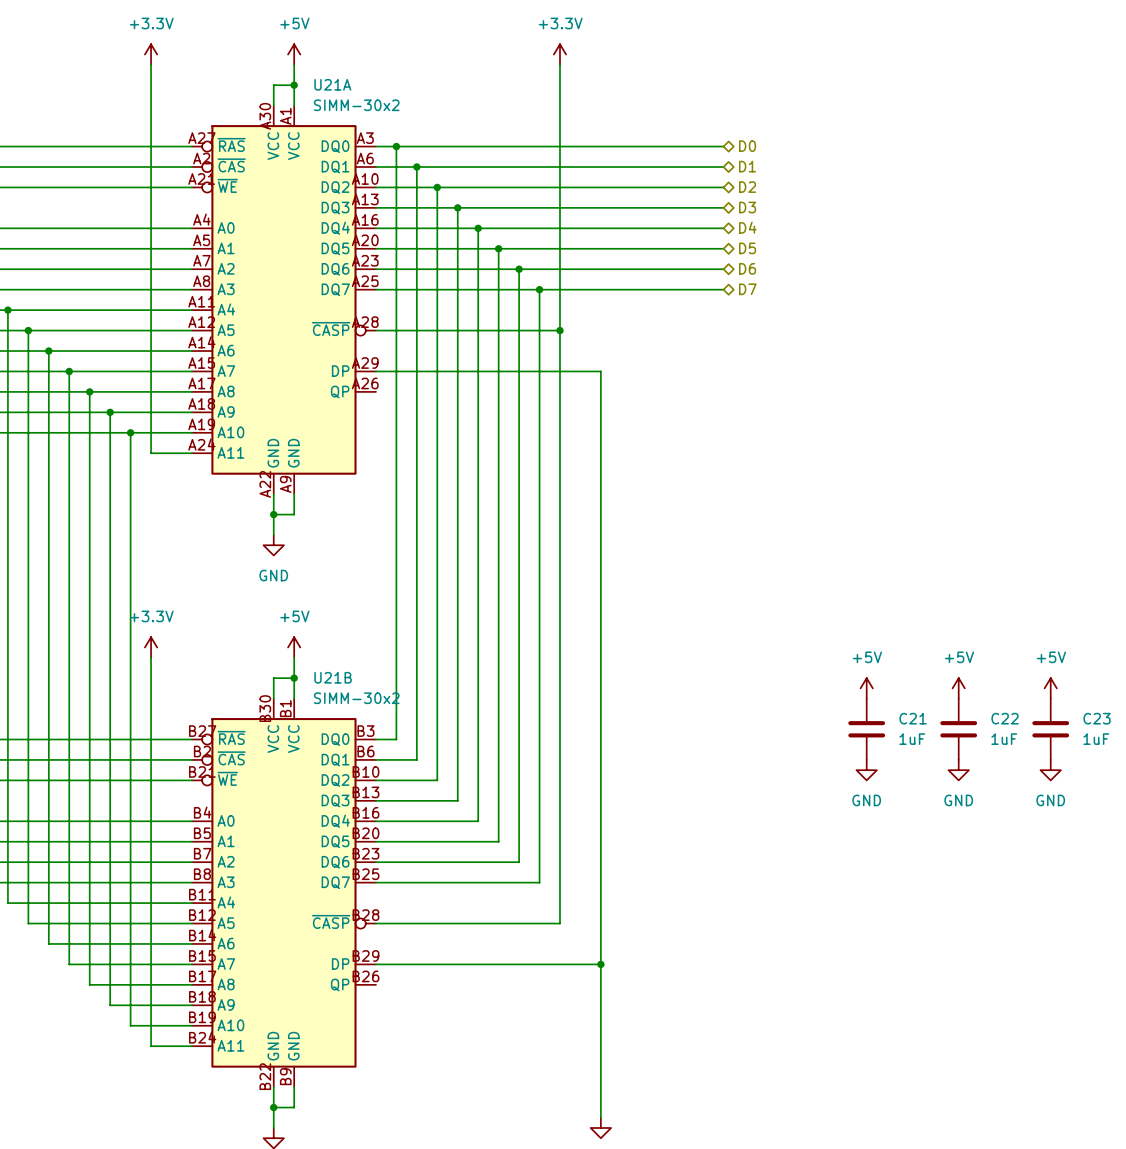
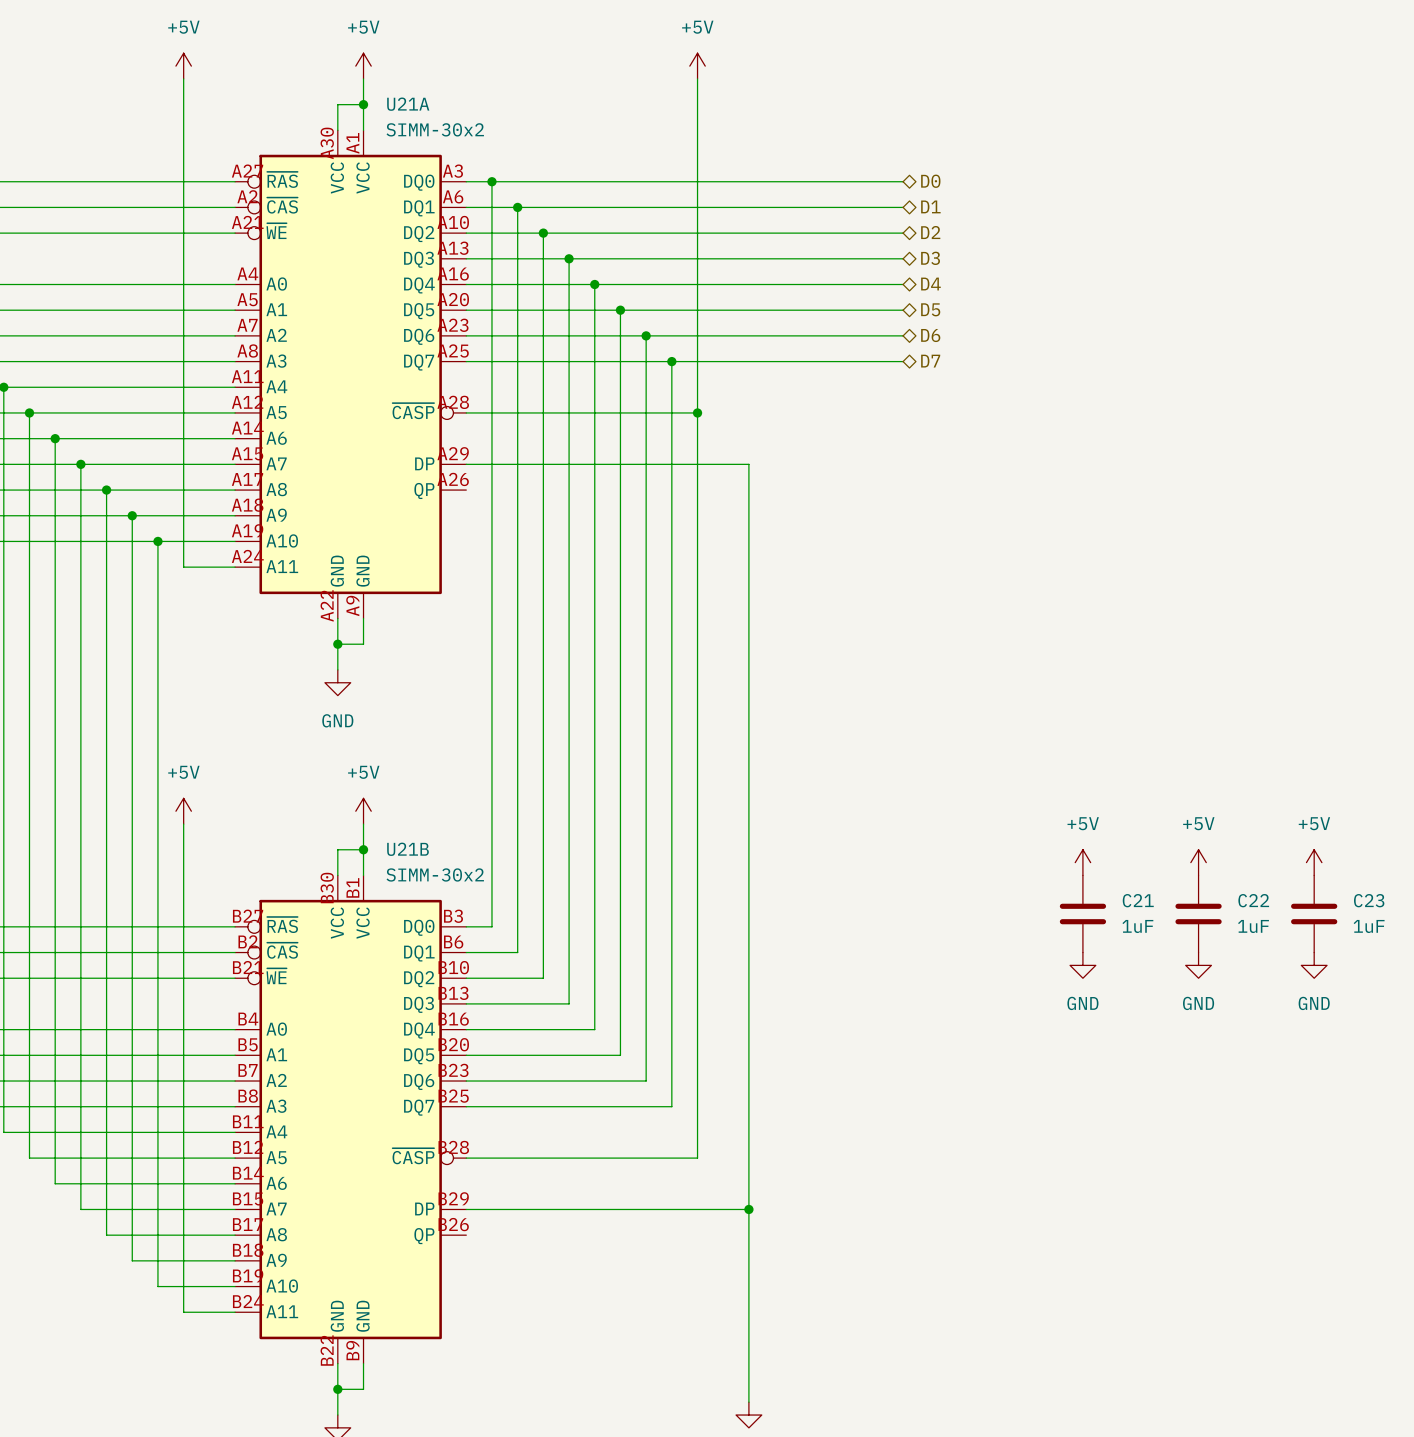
power symbol: +3.3V (151, 54) -> +5V (183, 66)
power symbol: +3.3V (559, 54) -> +5V (697, 66)
power symbol: +3.3V (151, 647) -> +5V (183, 811)

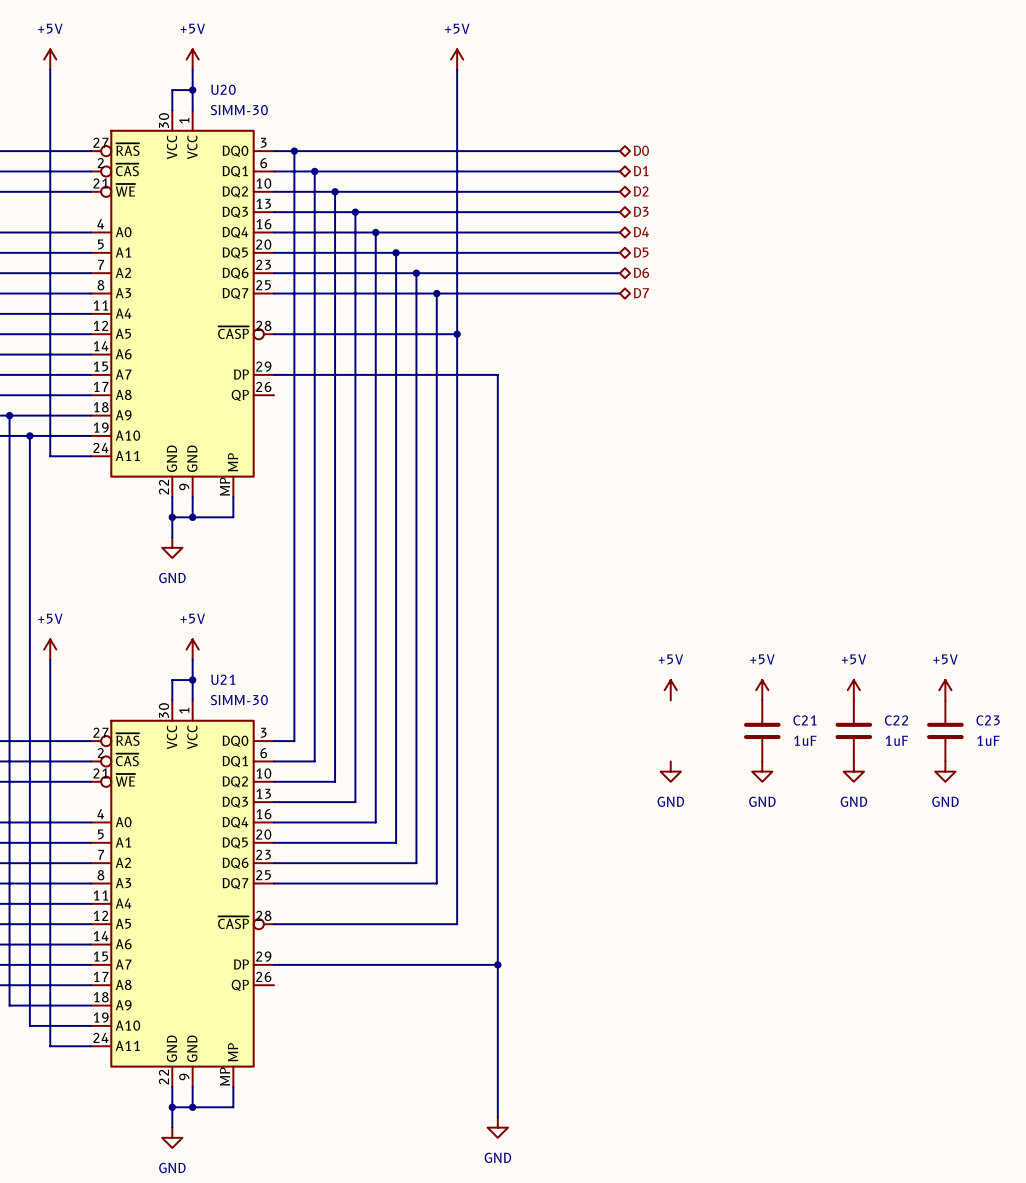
U21A: SIMM-30x2 (350, 374) -> none
U20: none -> SIMM-30 (182, 303)
wire: none -> (233, 496) (233, 517) (192, 517)
junction: none -> (192, 517)
power symbol: none -> +5V (670, 690)
power symbol: none -> GND (670, 771)
U21B: SIMM-30x2 (350, 1119) -> none
U21: none -> SIMM-30 (182, 893)
wire: none -> (233, 1086) (233, 1107) (192, 1107)
junction: none -> (192, 1107)

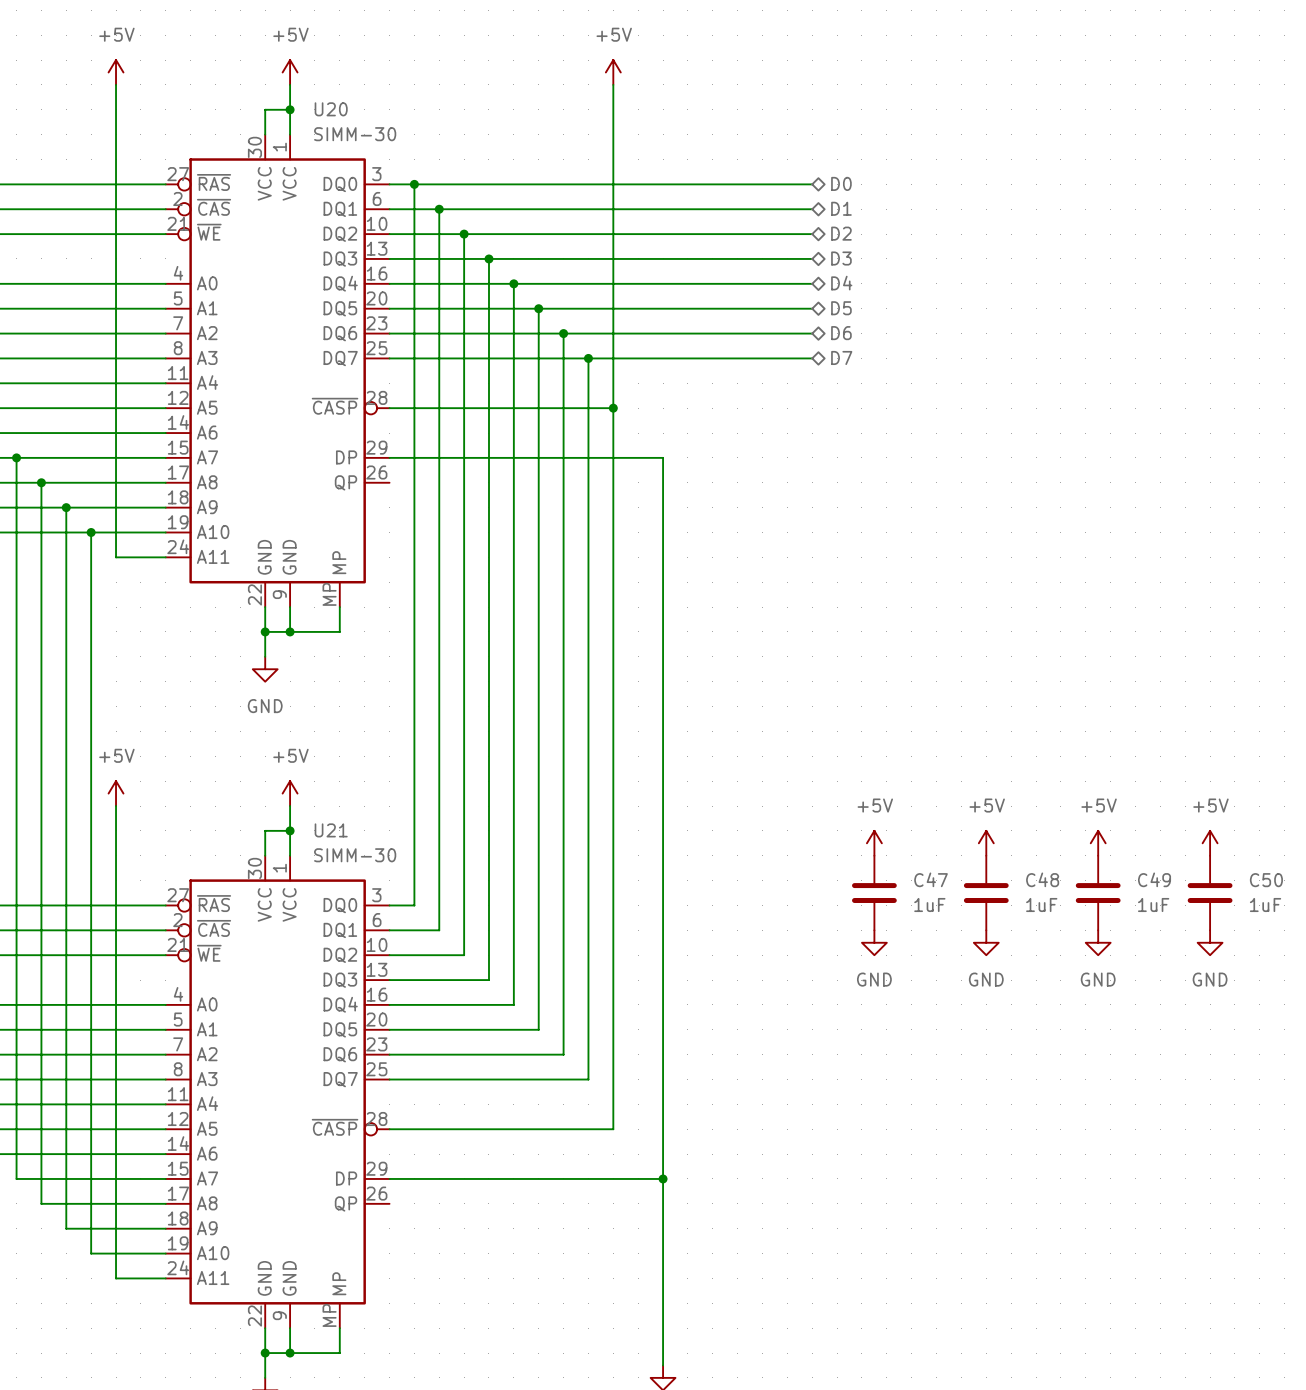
C21 name: C21 (804, 720) -> C48 (1042, 879)
C22 name: C22 (896, 720) -> C49 (1154, 879)
C23 name: C23 (988, 720) -> C50 (1266, 880)
C47: none -> 1uF (874, 893)

